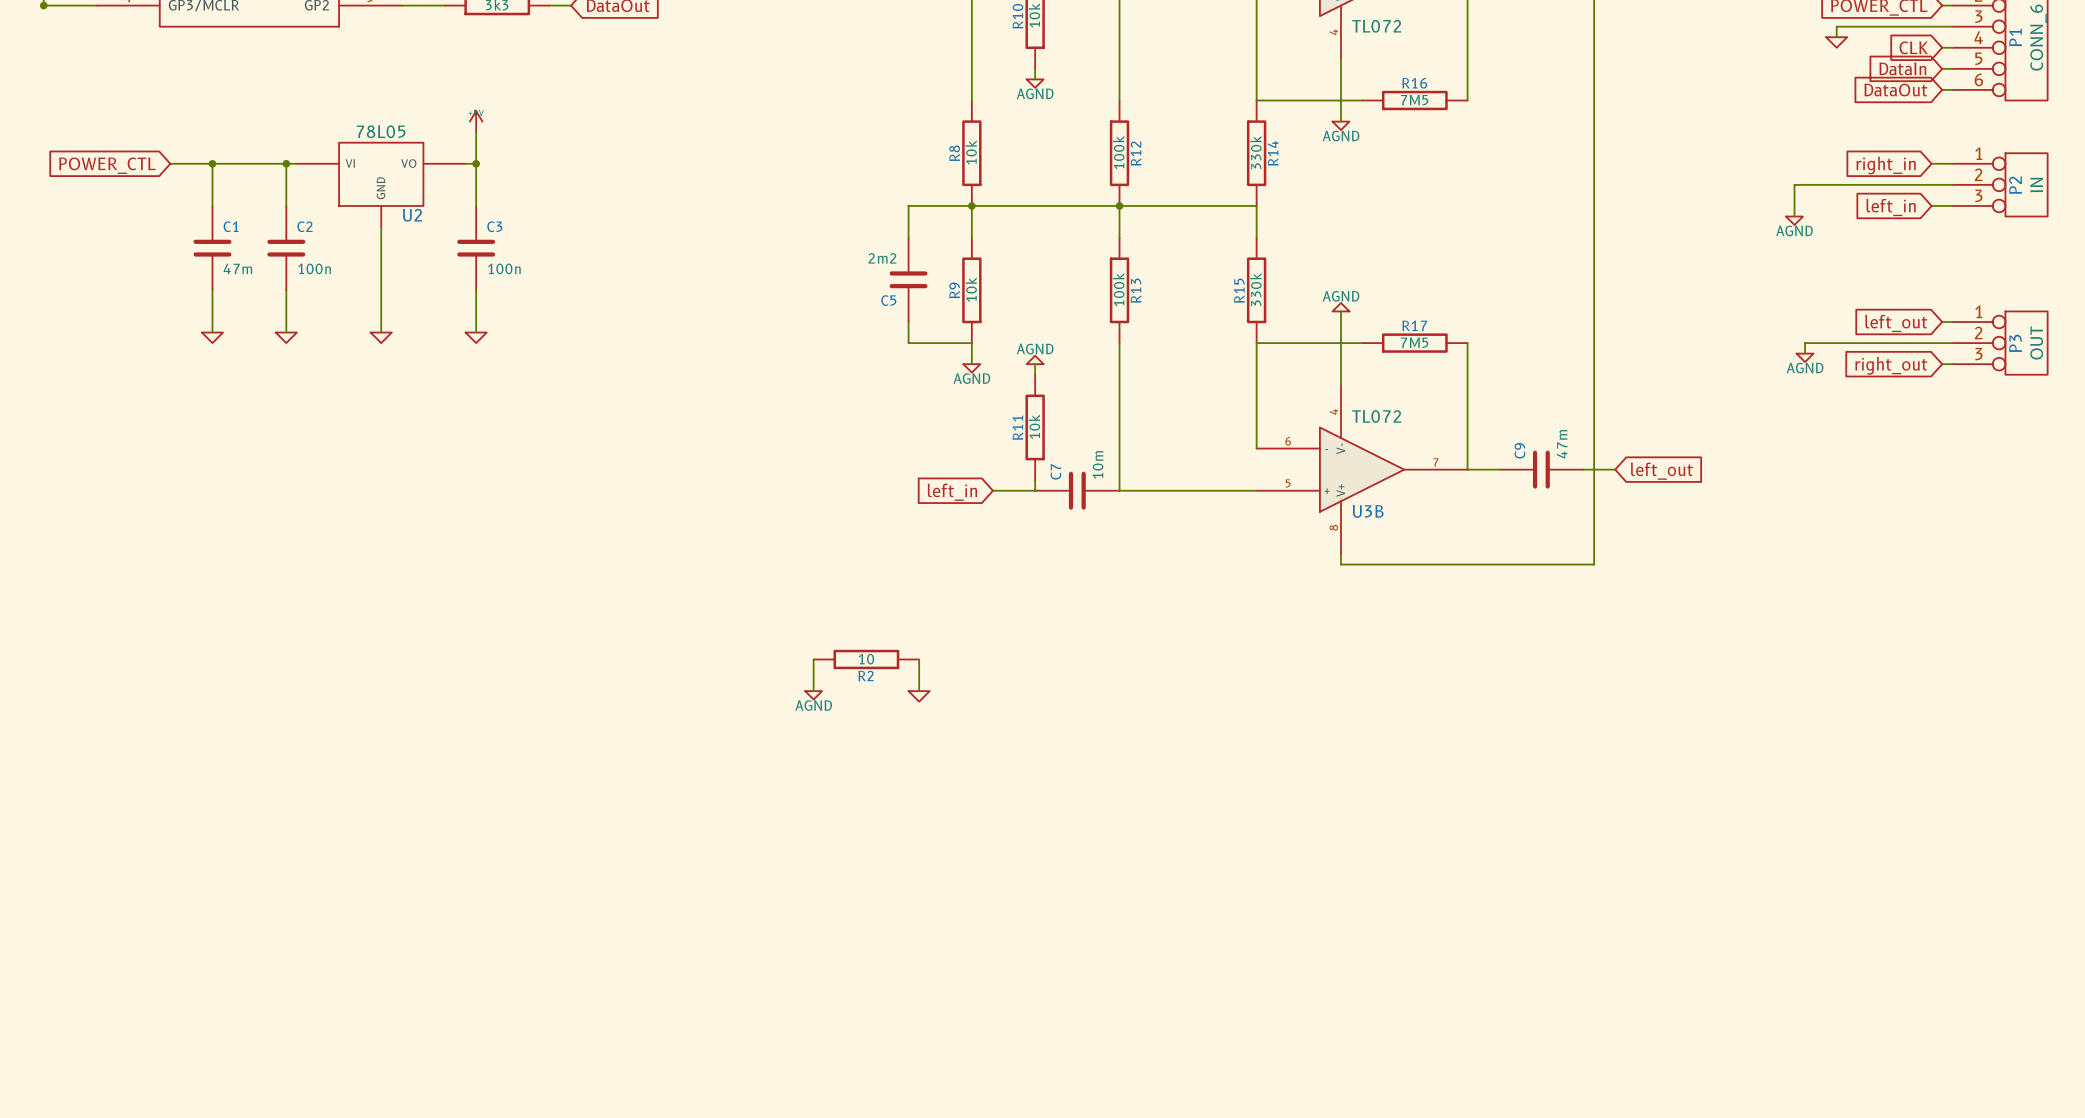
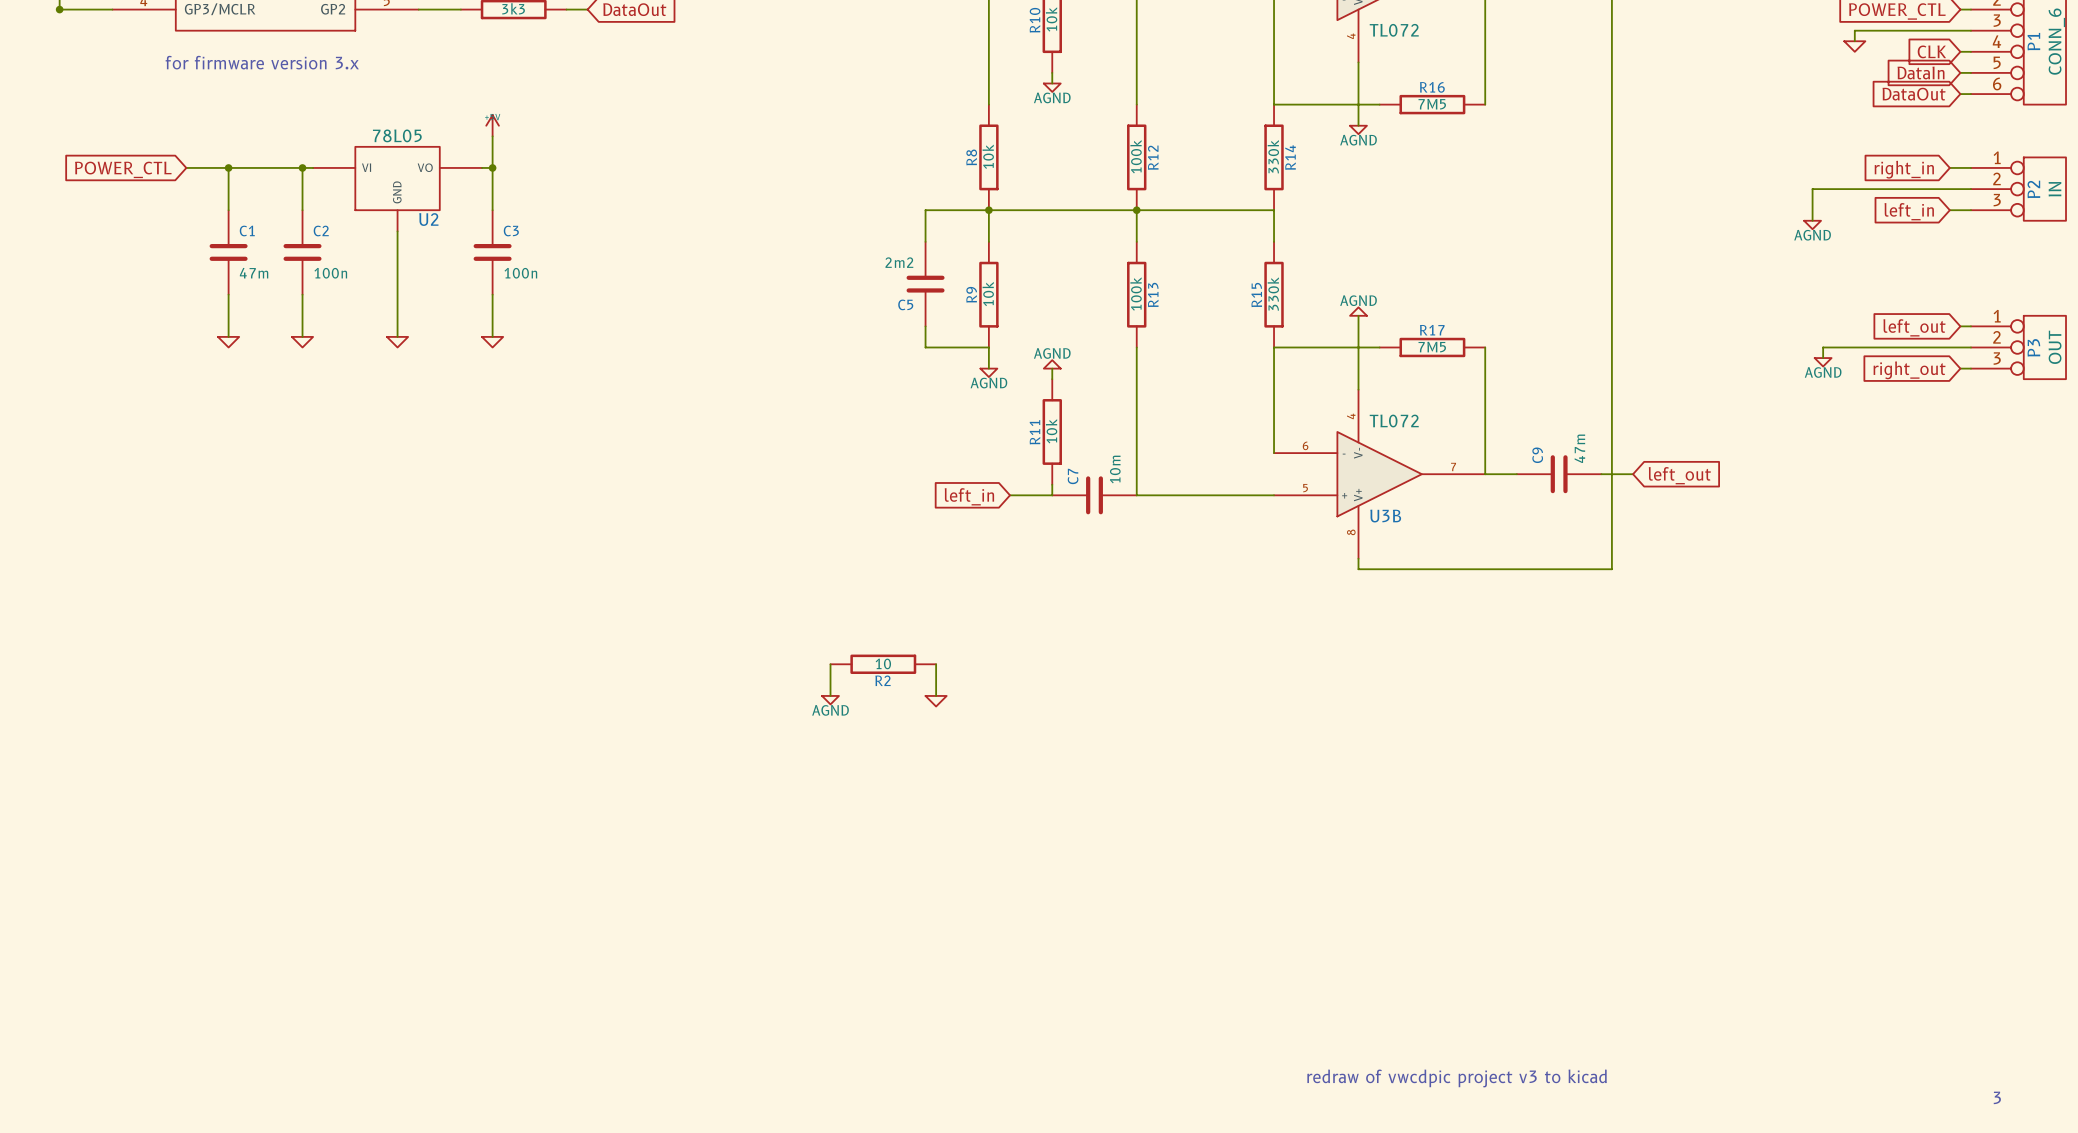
text: none -> for firmware version 3.x (262, 62)
text: none -> redraw of vwcdpic project v3 to kicad (1457, 1078)
text: none -> 3 (1997, 1097)

